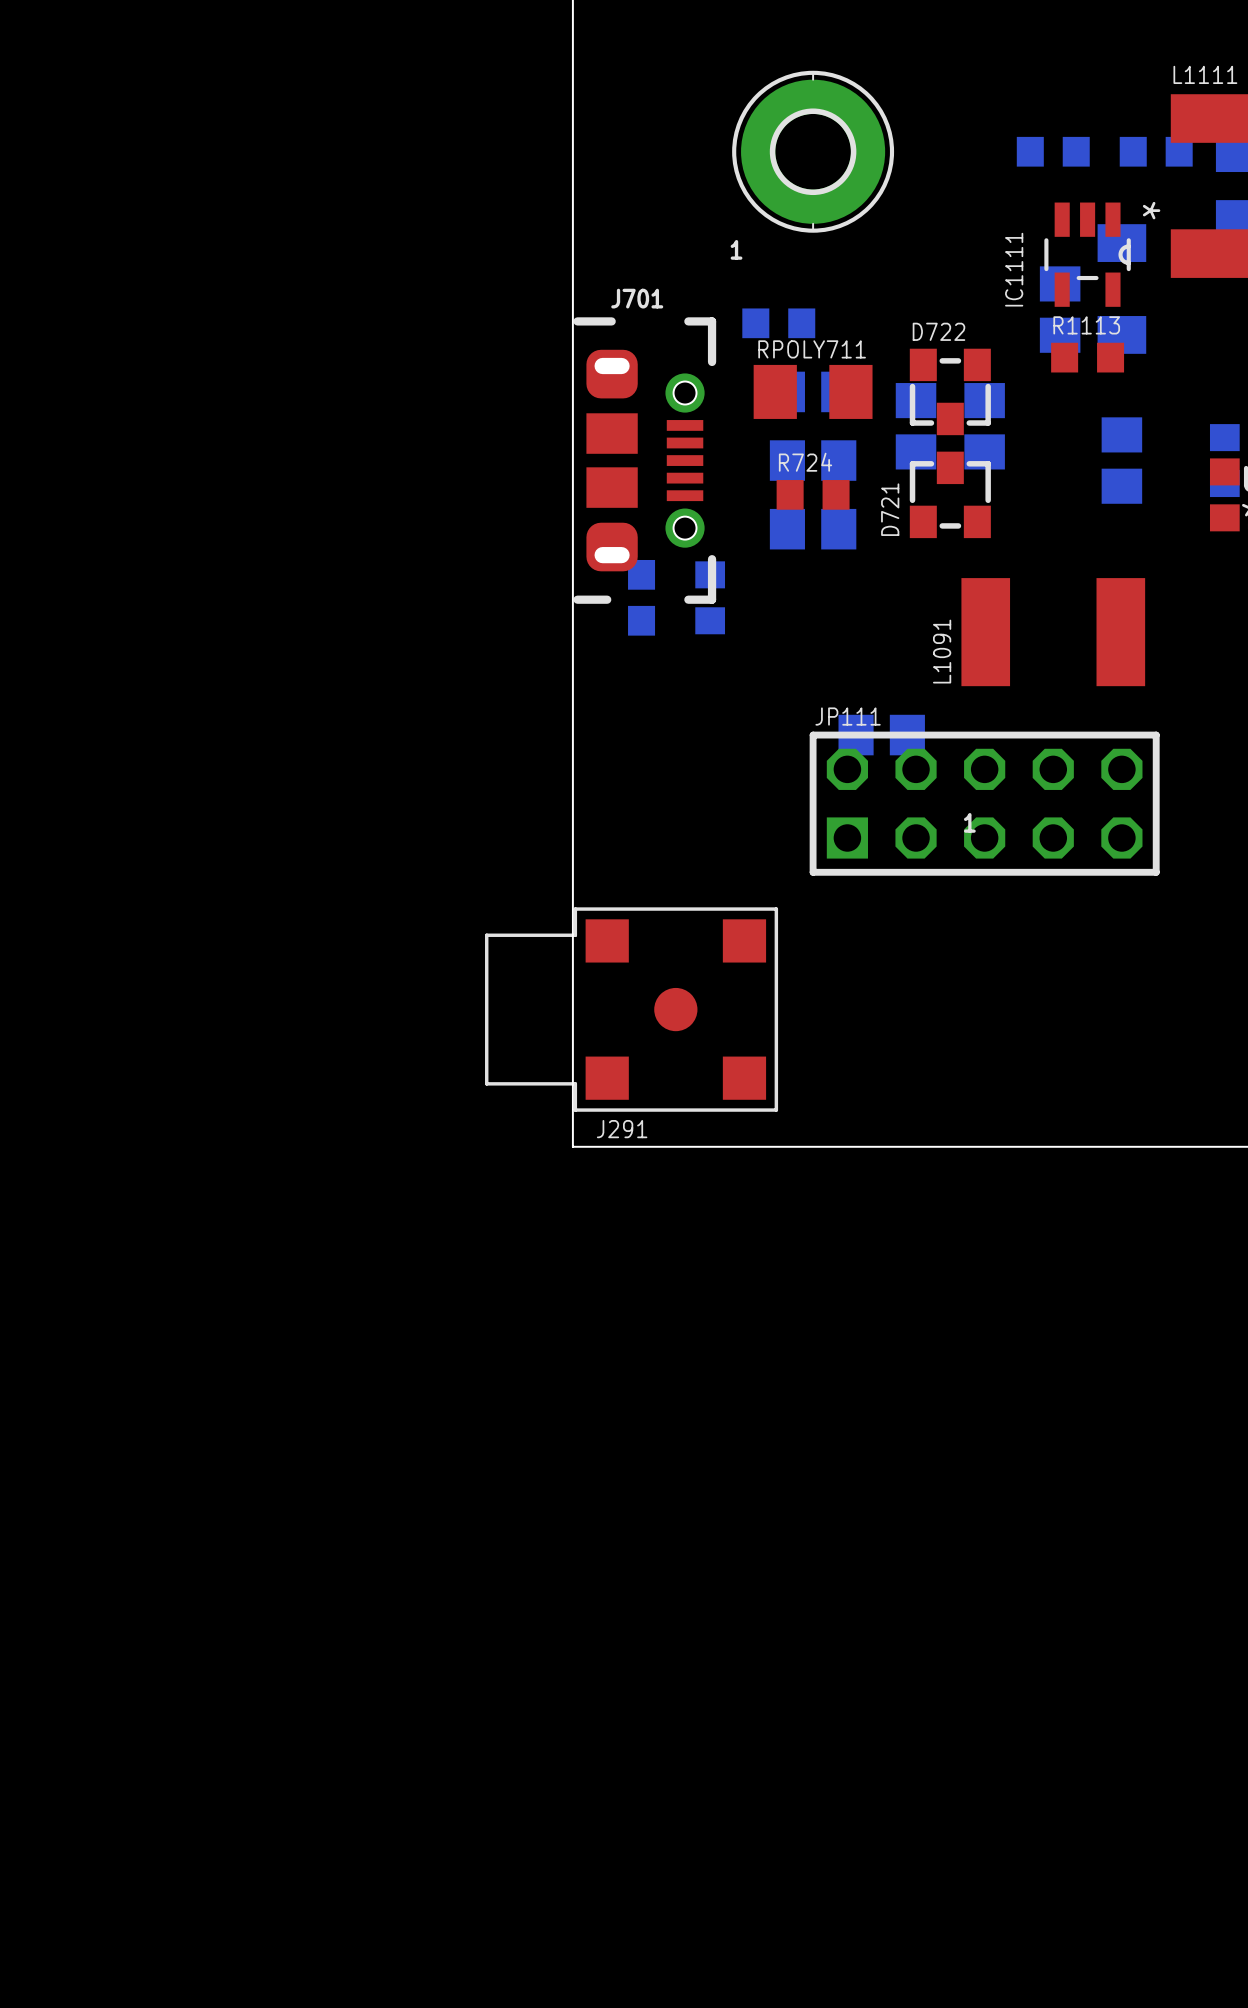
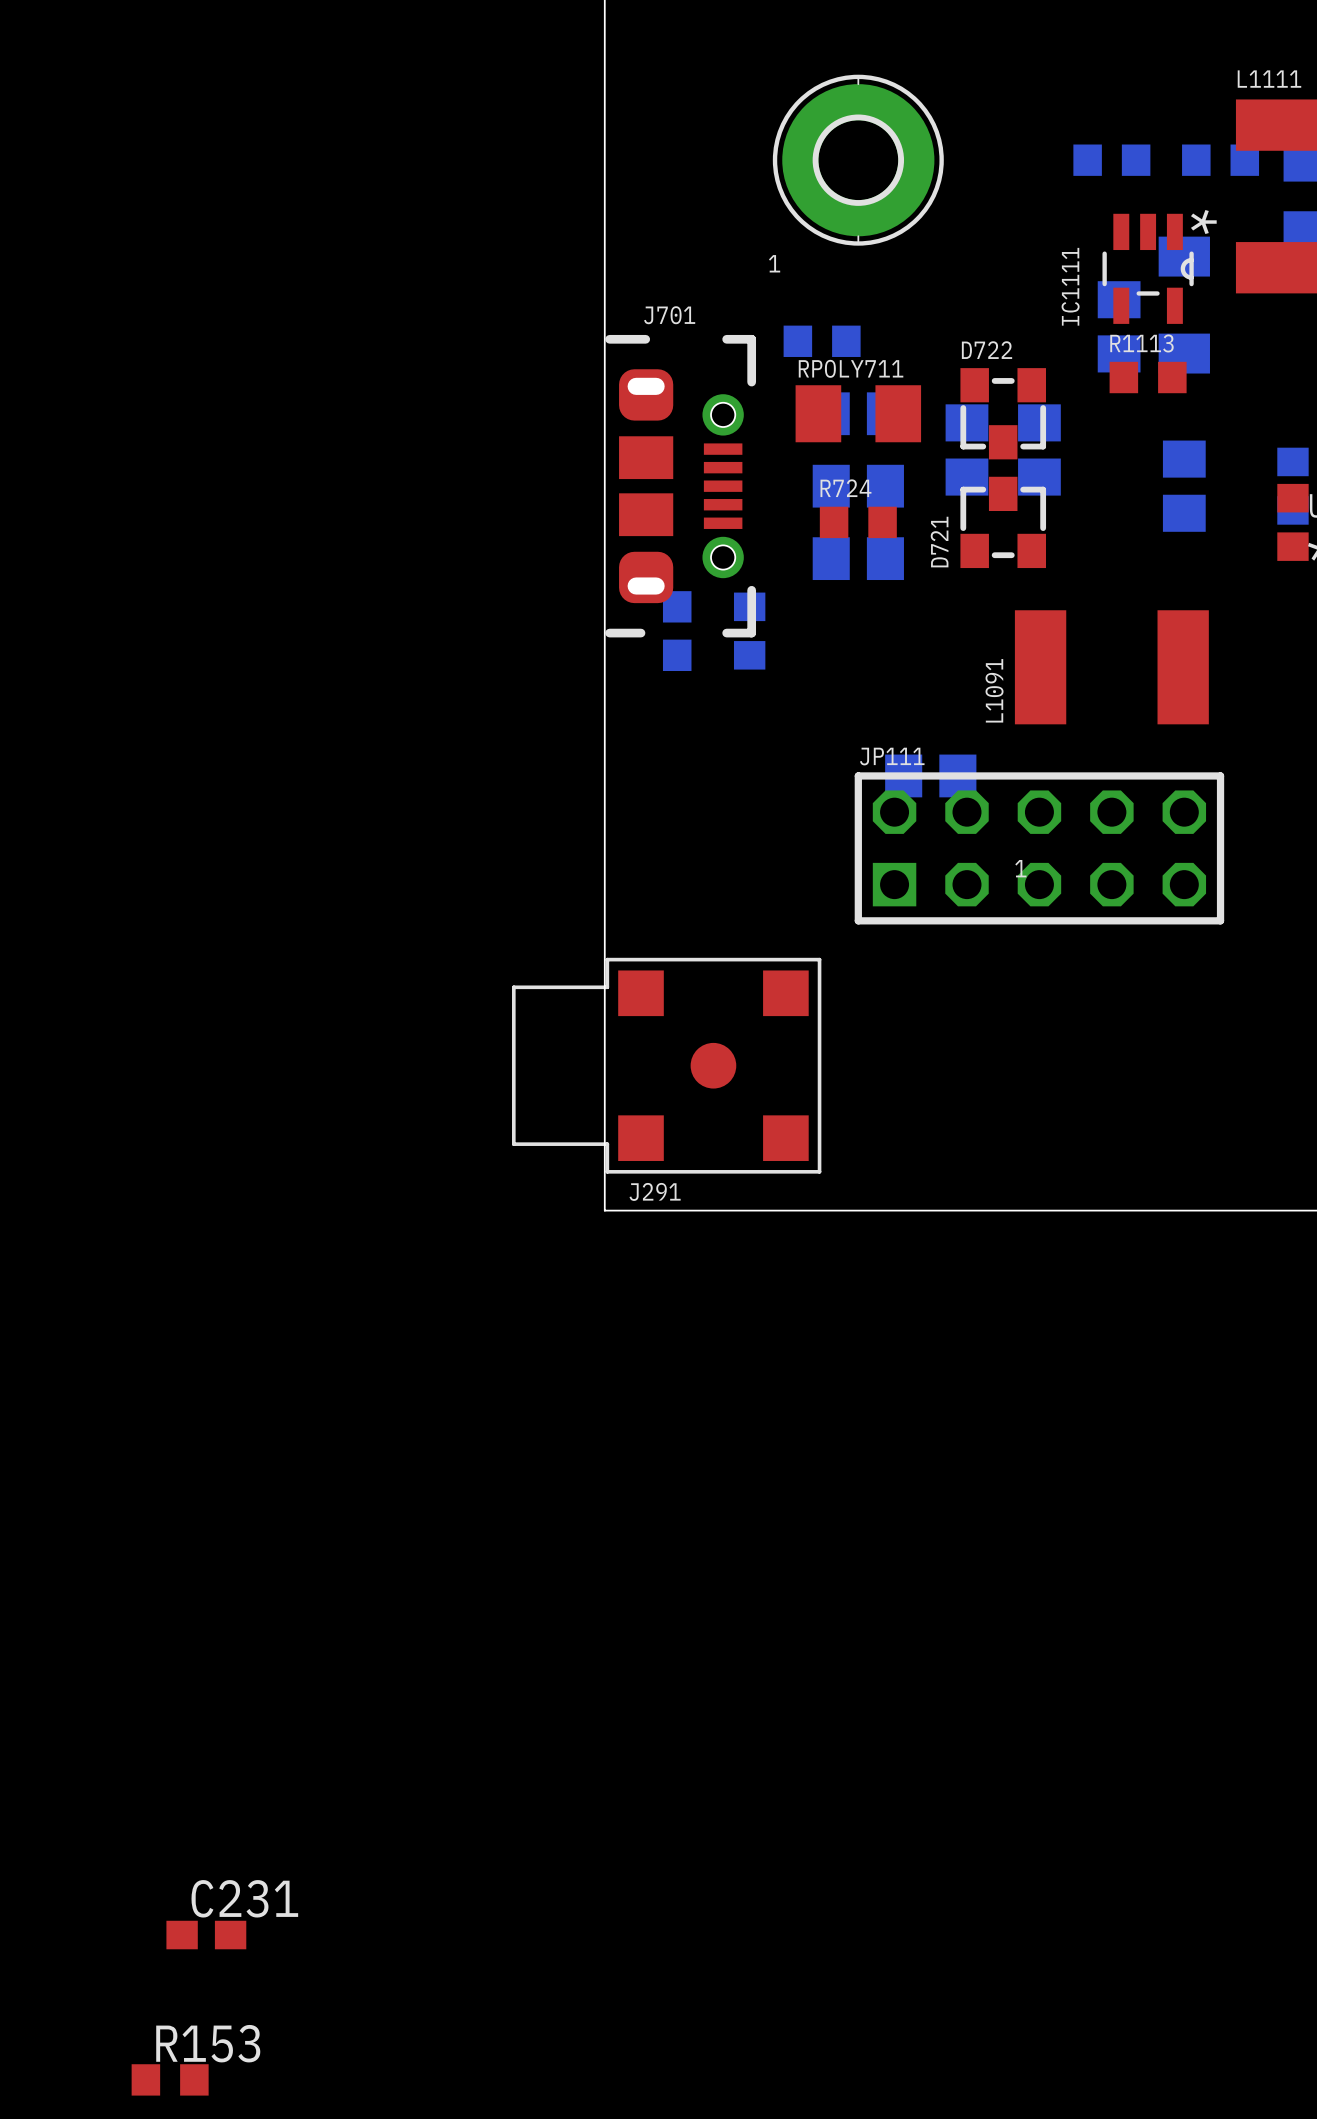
C231: none -> (206, 1935)
R153: none -> (170, 2079)

